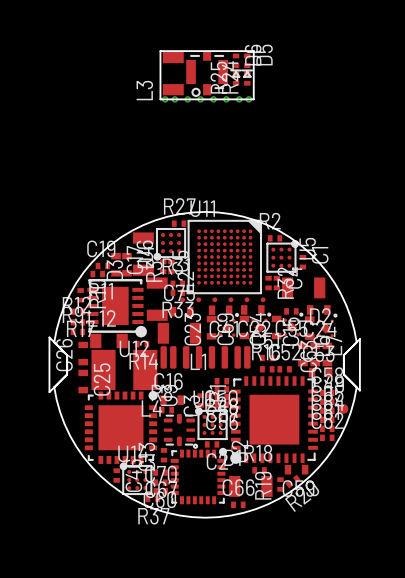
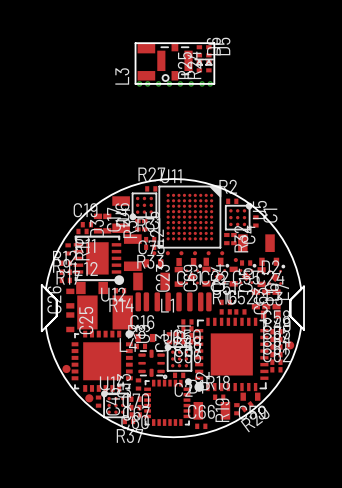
part: none -> (235, 260)
part: none -> (66, 368)
part: none -> (89, 398)

